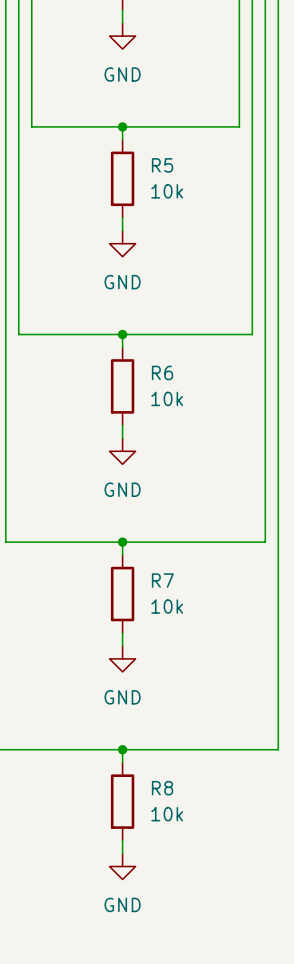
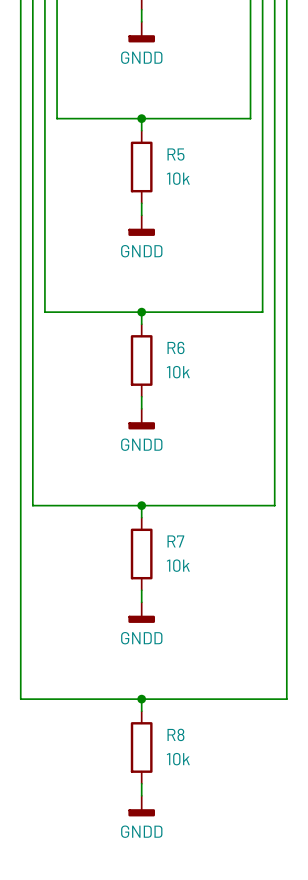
power symbol: GND (122, 36) -> GNDD (141, 32)
power symbol: GND (122, 243) -> GNDD (141, 225)
power symbol: GND (122, 451) -> GNDD (141, 419)
power symbol: GND (122, 658) -> GNDD (141, 612)
power symbol: GND (122, 866) -> GNDD (141, 806)

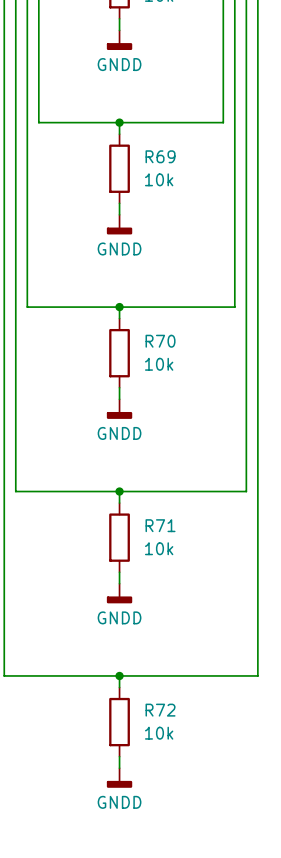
R5 name: R5 (175, 154) -> R69 (160, 156)
R6 name: R6 (175, 347) -> R70 (160, 341)
R7 name: R7 (175, 541) -> R71 (160, 525)
R8 name: R8 (175, 734) -> R72 (160, 710)

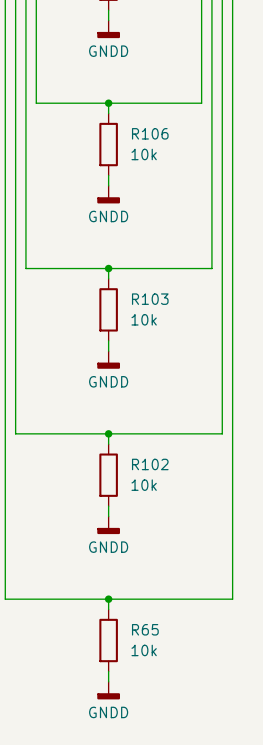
R69 name: R69 (160, 156) -> R106 (150, 133)
R70 name: R70 (160, 341) -> R103 (150, 299)
R71 name: R71 (160, 525) -> R102 (150, 464)
R72 name: R72 (160, 710) -> R65 (145, 629)

